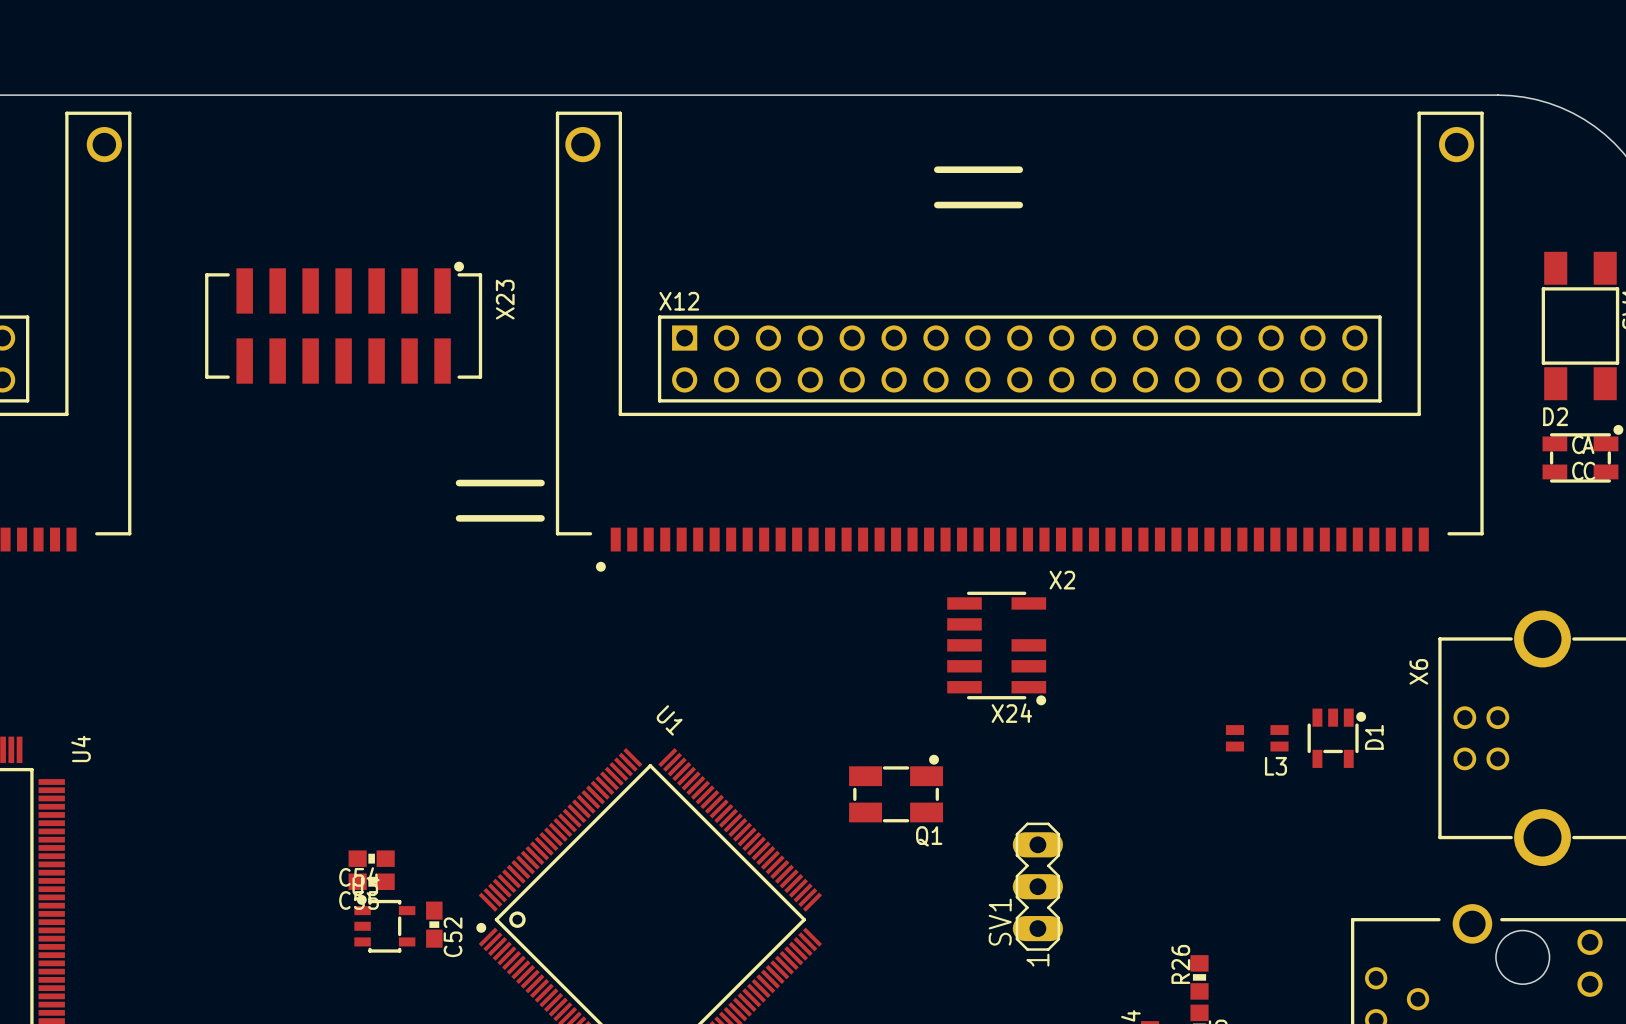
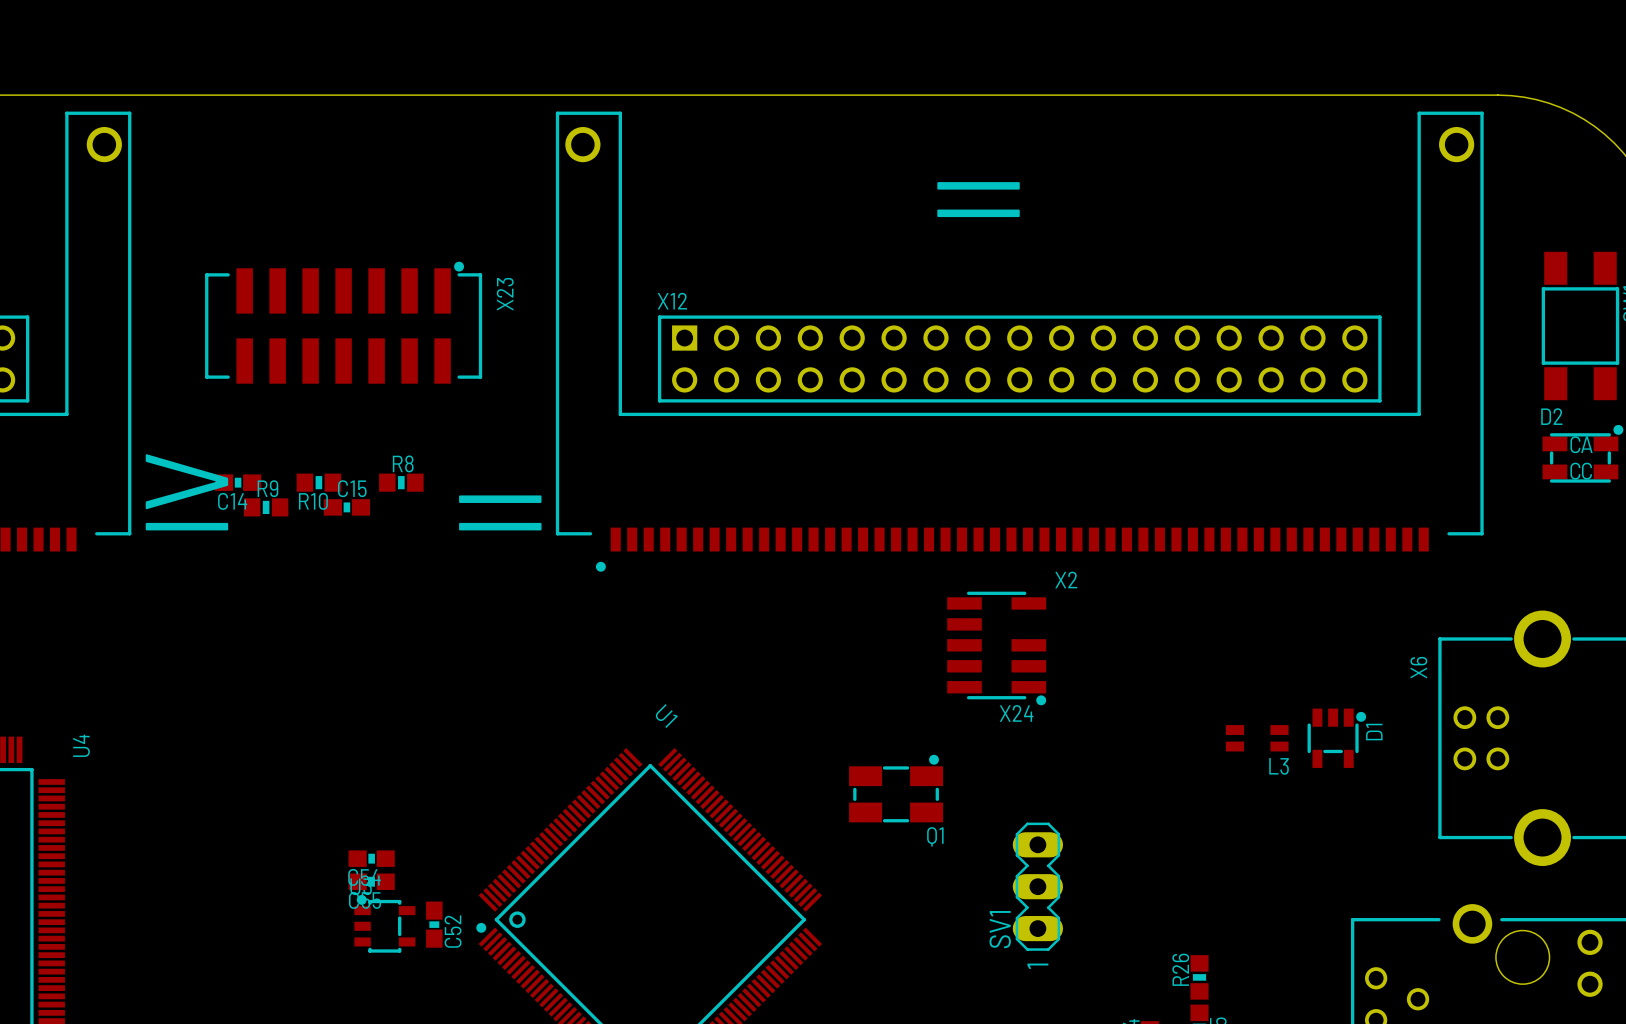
text: none -> IV (186, 492)
C14: none -> (238, 482)
R10: none -> (318, 482)
R8: none -> (401, 482)
R9: none -> (266, 507)
C15: none -> (346, 507)

